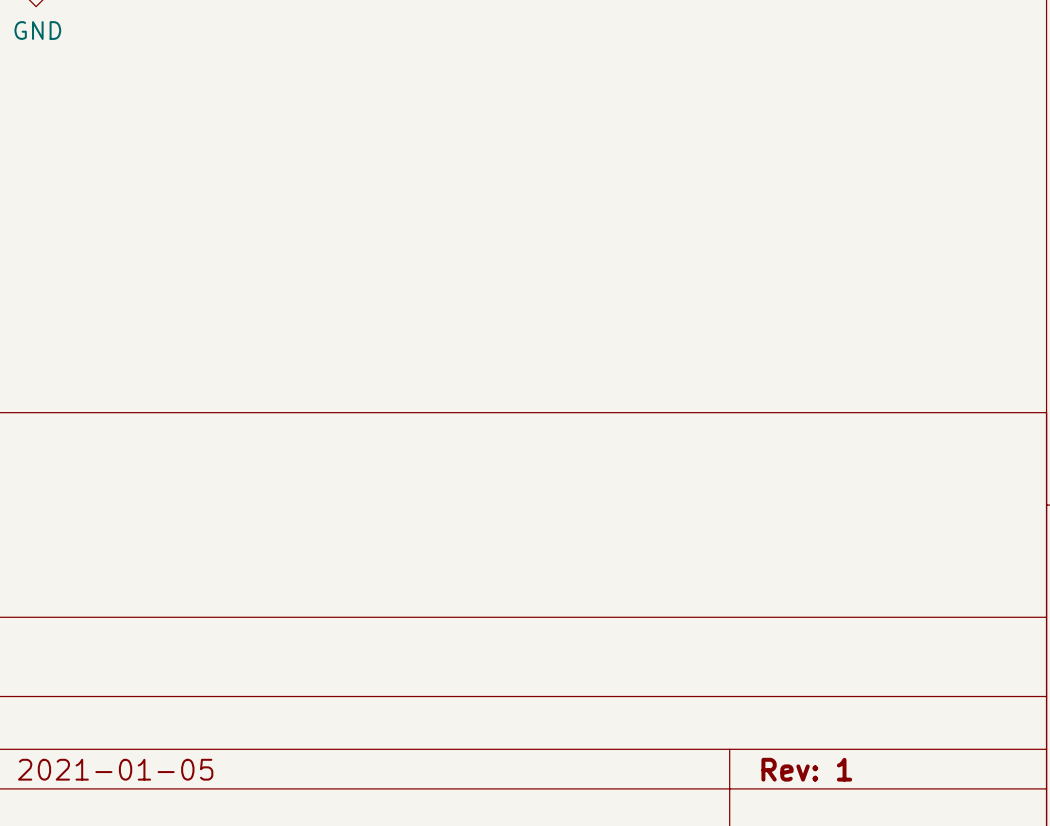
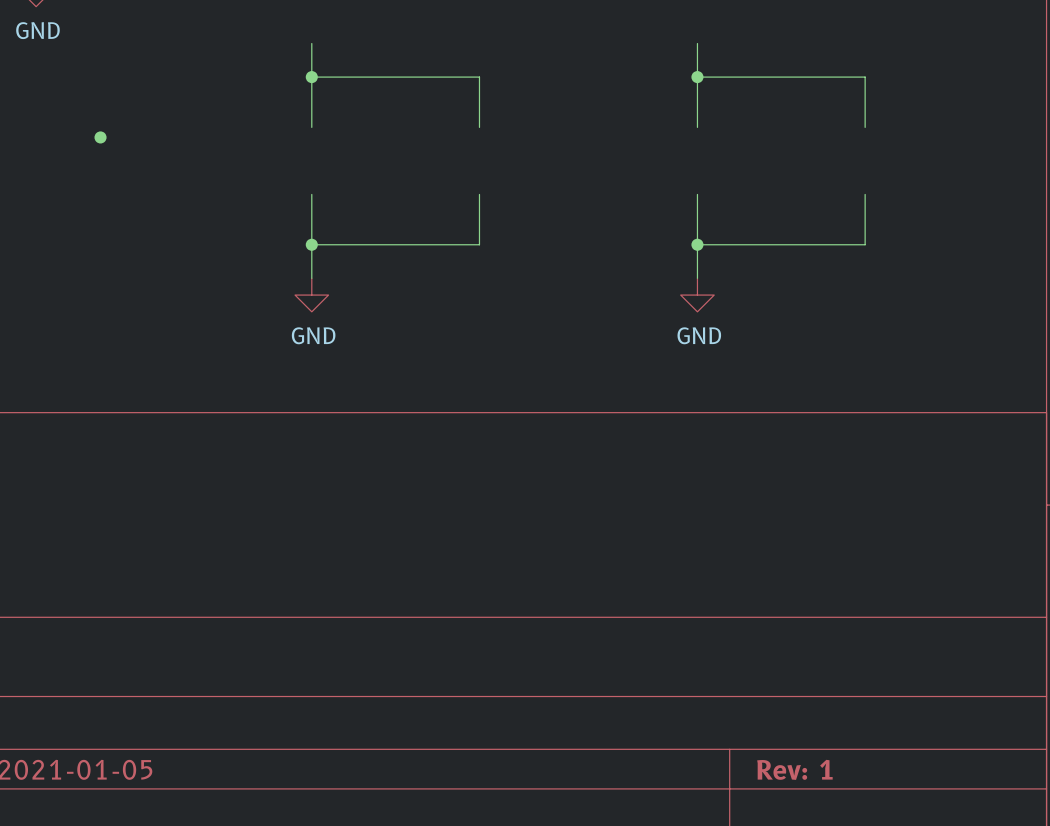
wire: none -> (311, 43) (311, 127)
wire: none -> (697, 43) (697, 127)
wire: none -> (311, 77) (479, 77) (479, 127)
junction: none -> (311, 77)
wire: none -> (697, 77) (865, 77) (865, 127)
junction: none -> (697, 77)
junction: none -> (100, 137)
wire: none -> (311, 194) (311, 278)
wire: none -> (479, 194) (479, 244) (311, 244)
wire: none -> (697, 194) (697, 278)
wire: none -> (865, 194) (865, 244) (697, 244)
junction: none -> (311, 244)
junction: none -> (697, 244)
power symbol: none -> GND (311, 295)
power symbol: none -> GND (697, 295)

